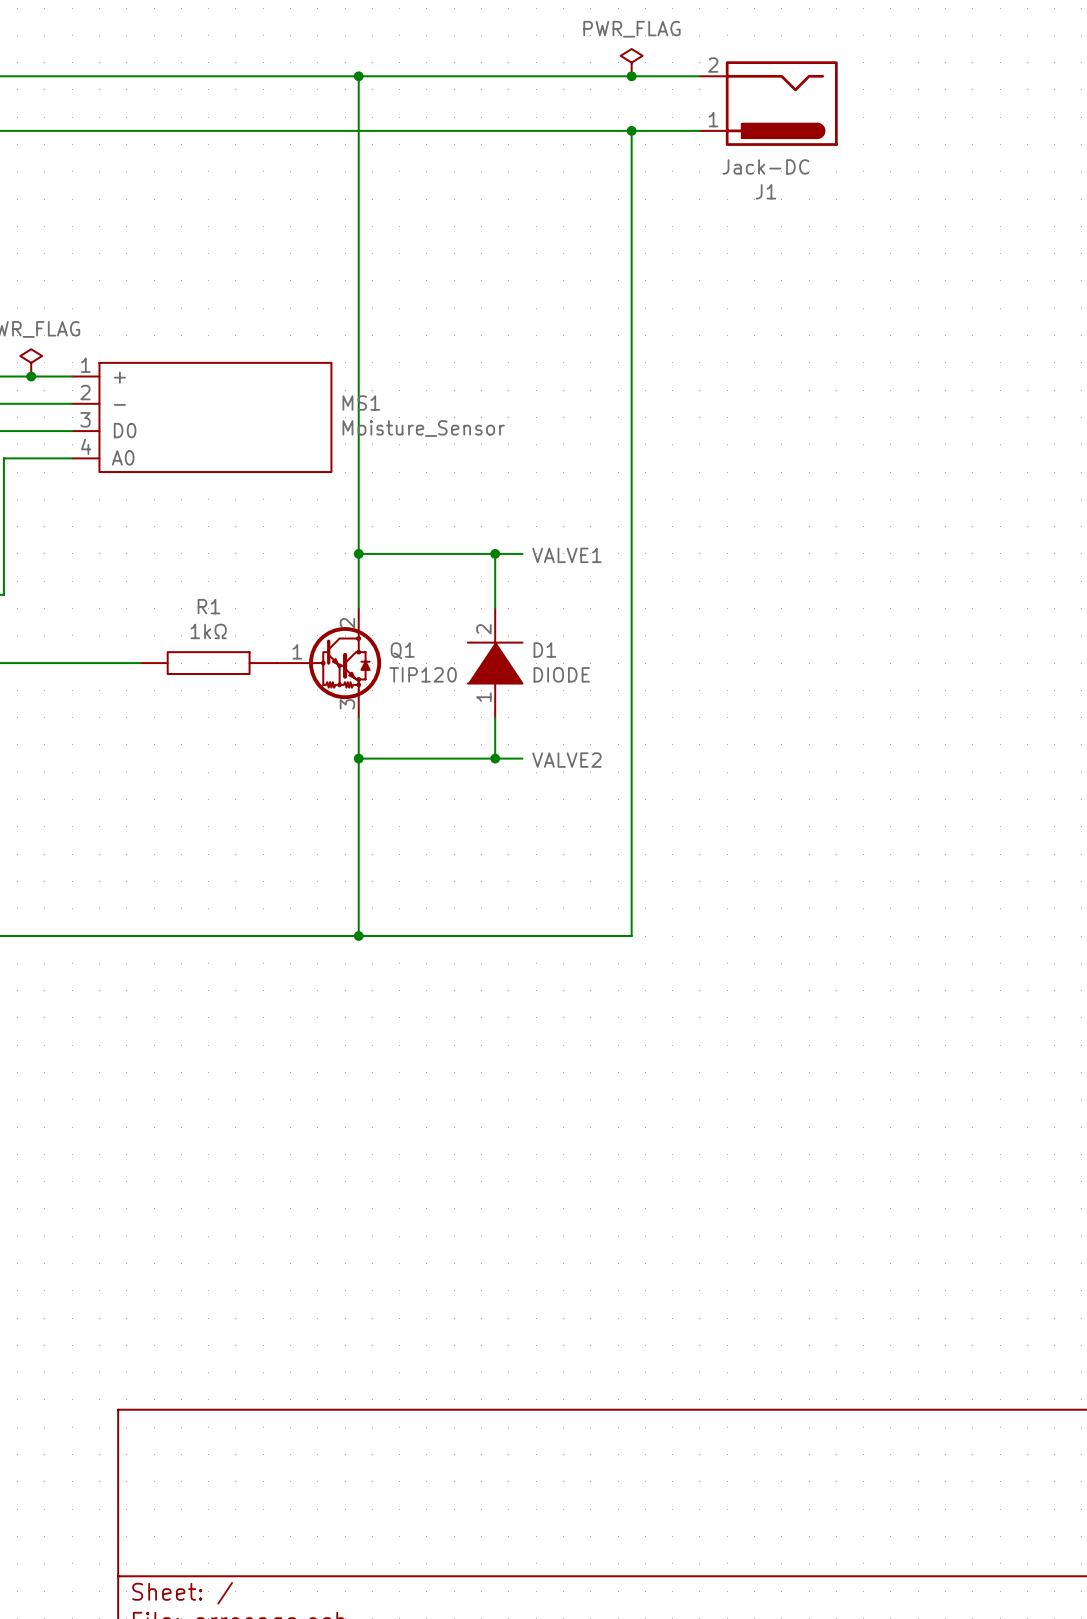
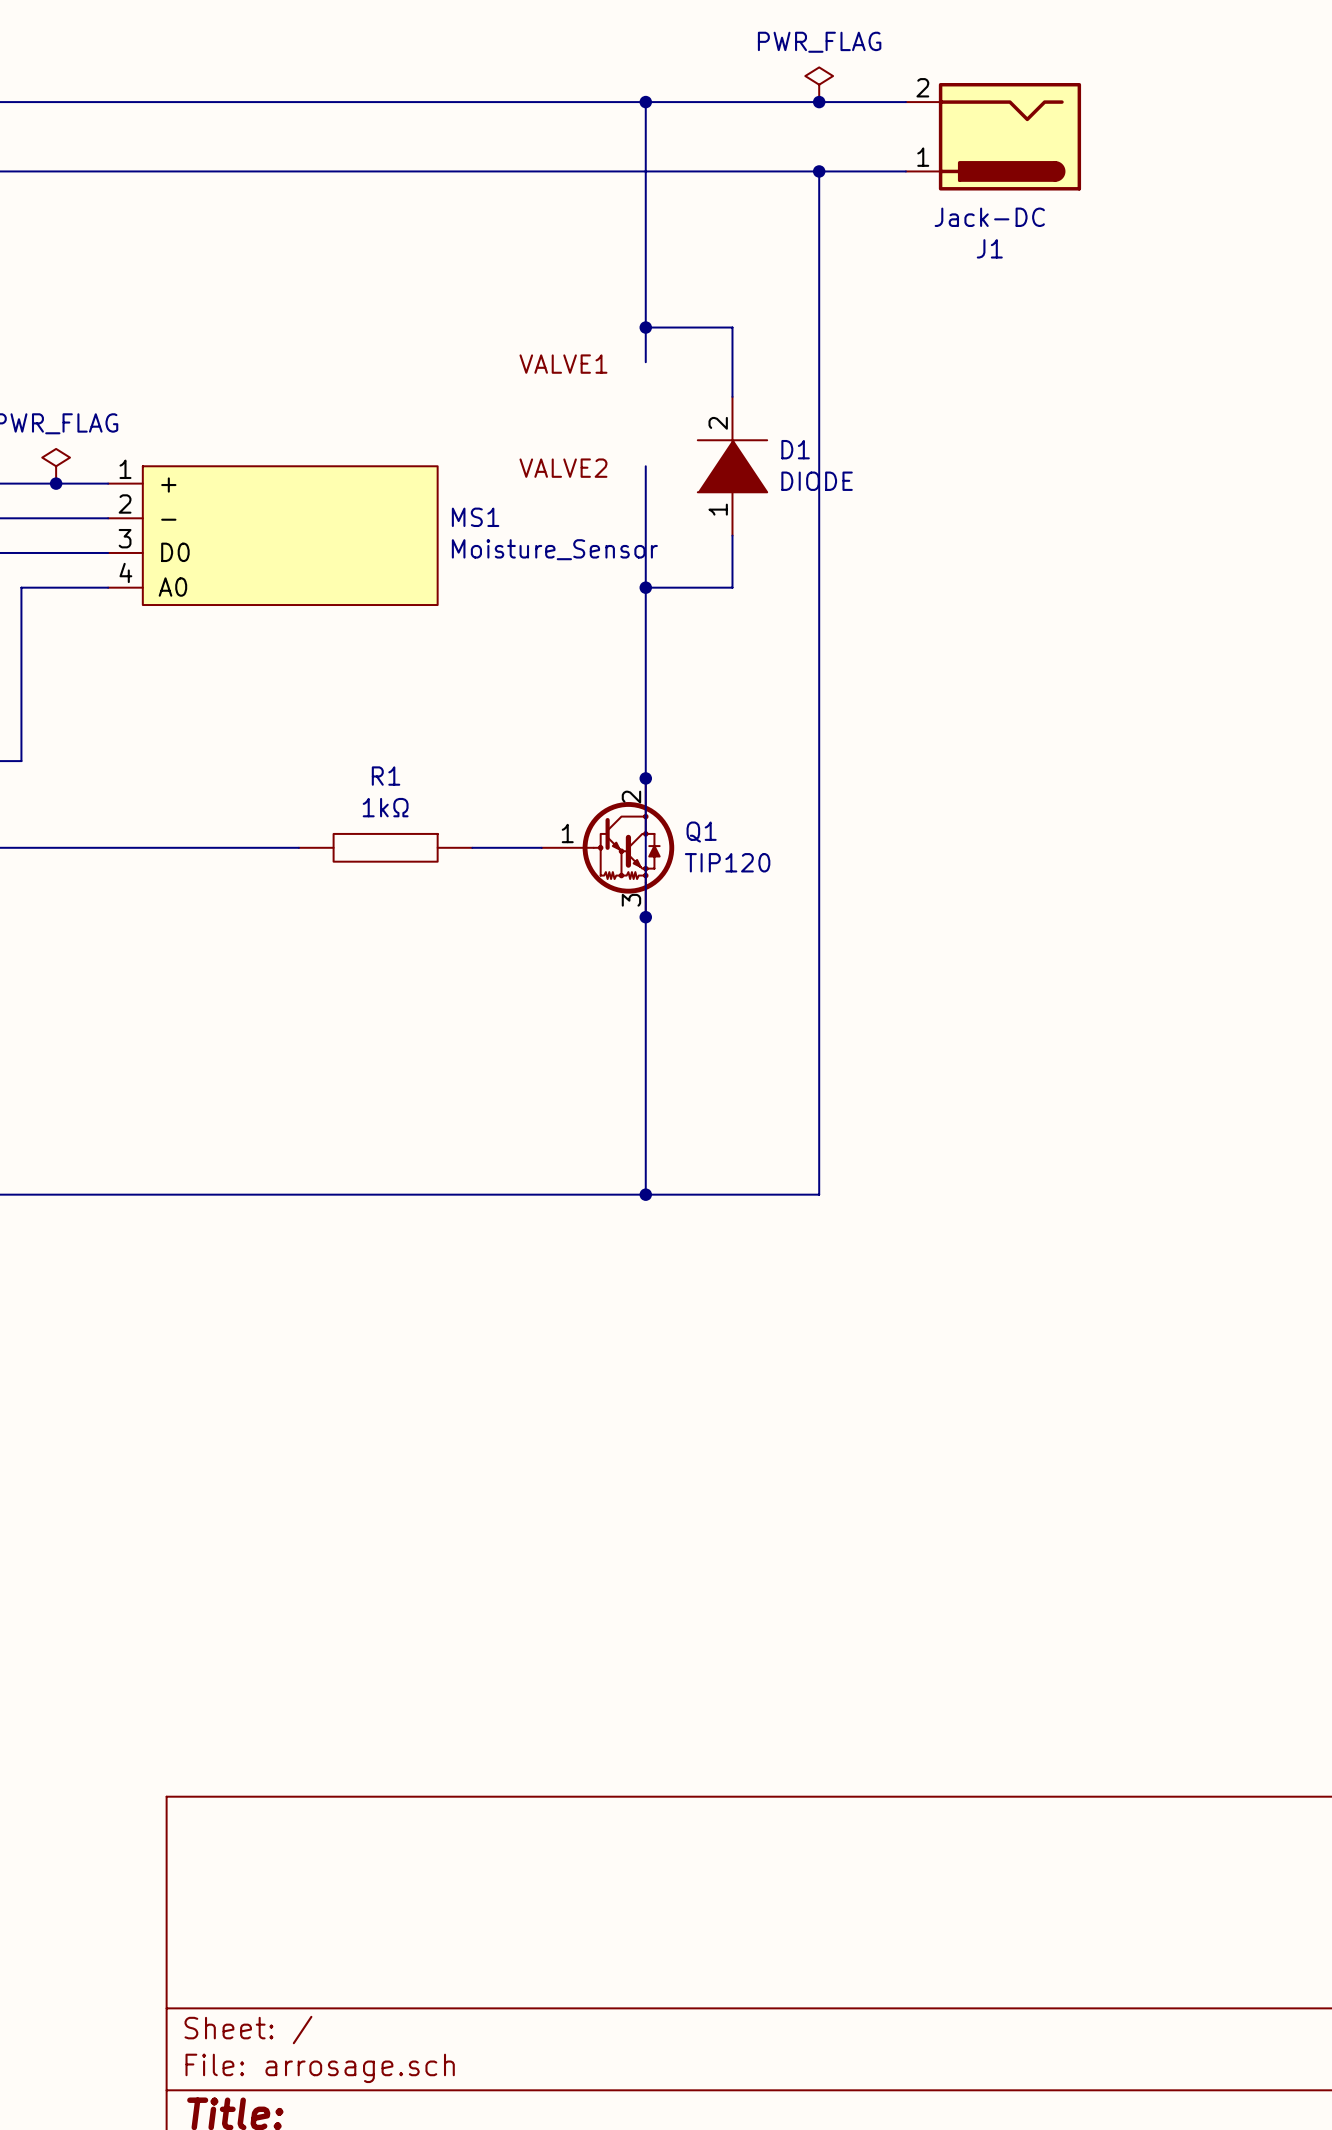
wire: (358, 76) (358, 608) -> none
junction: (358, 76) -> none
wire: none -> (645, 102) (645, 362)
junction: none -> (645, 102)
wire: none -> (645, 327) (732, 327) (732, 396)
junction: none -> (645, 327)
label: none -> VALVE1 (563, 364)
wire: none -> (645, 466) (645, 709)
label: none -> VALVE2 (563, 468)
wire: none -> (732, 535) (732, 587) (645, 587)
junction: none -> (645, 587)
wire: (358, 553) (522, 553) -> none
junction: (358, 553) -> none
junction: (495, 553) -> none
label: VALVE1 (566, 555) -> none
junction: none -> (645, 778)
wire: none -> (194, 847) (298, 847)
R1 position: (208, 663) -> (385, 847)
Q1 position: (328, 663) -> (607, 847)
wire: none -> (472, 847) (541, 847)
D1 position: (495, 663) -> (732, 466)
wire: (358, 717) (358, 936) -> none
wire: (358, 758) (522, 758) -> none
junction: (358, 758) -> none
wire: none -> (645, 969) (645, 1194)
junction position: (495, 758) -> (645, 917)
label: VALVE2 (566, 760) -> none
junction: (358, 936) -> none
junction: none -> (645, 1194)

